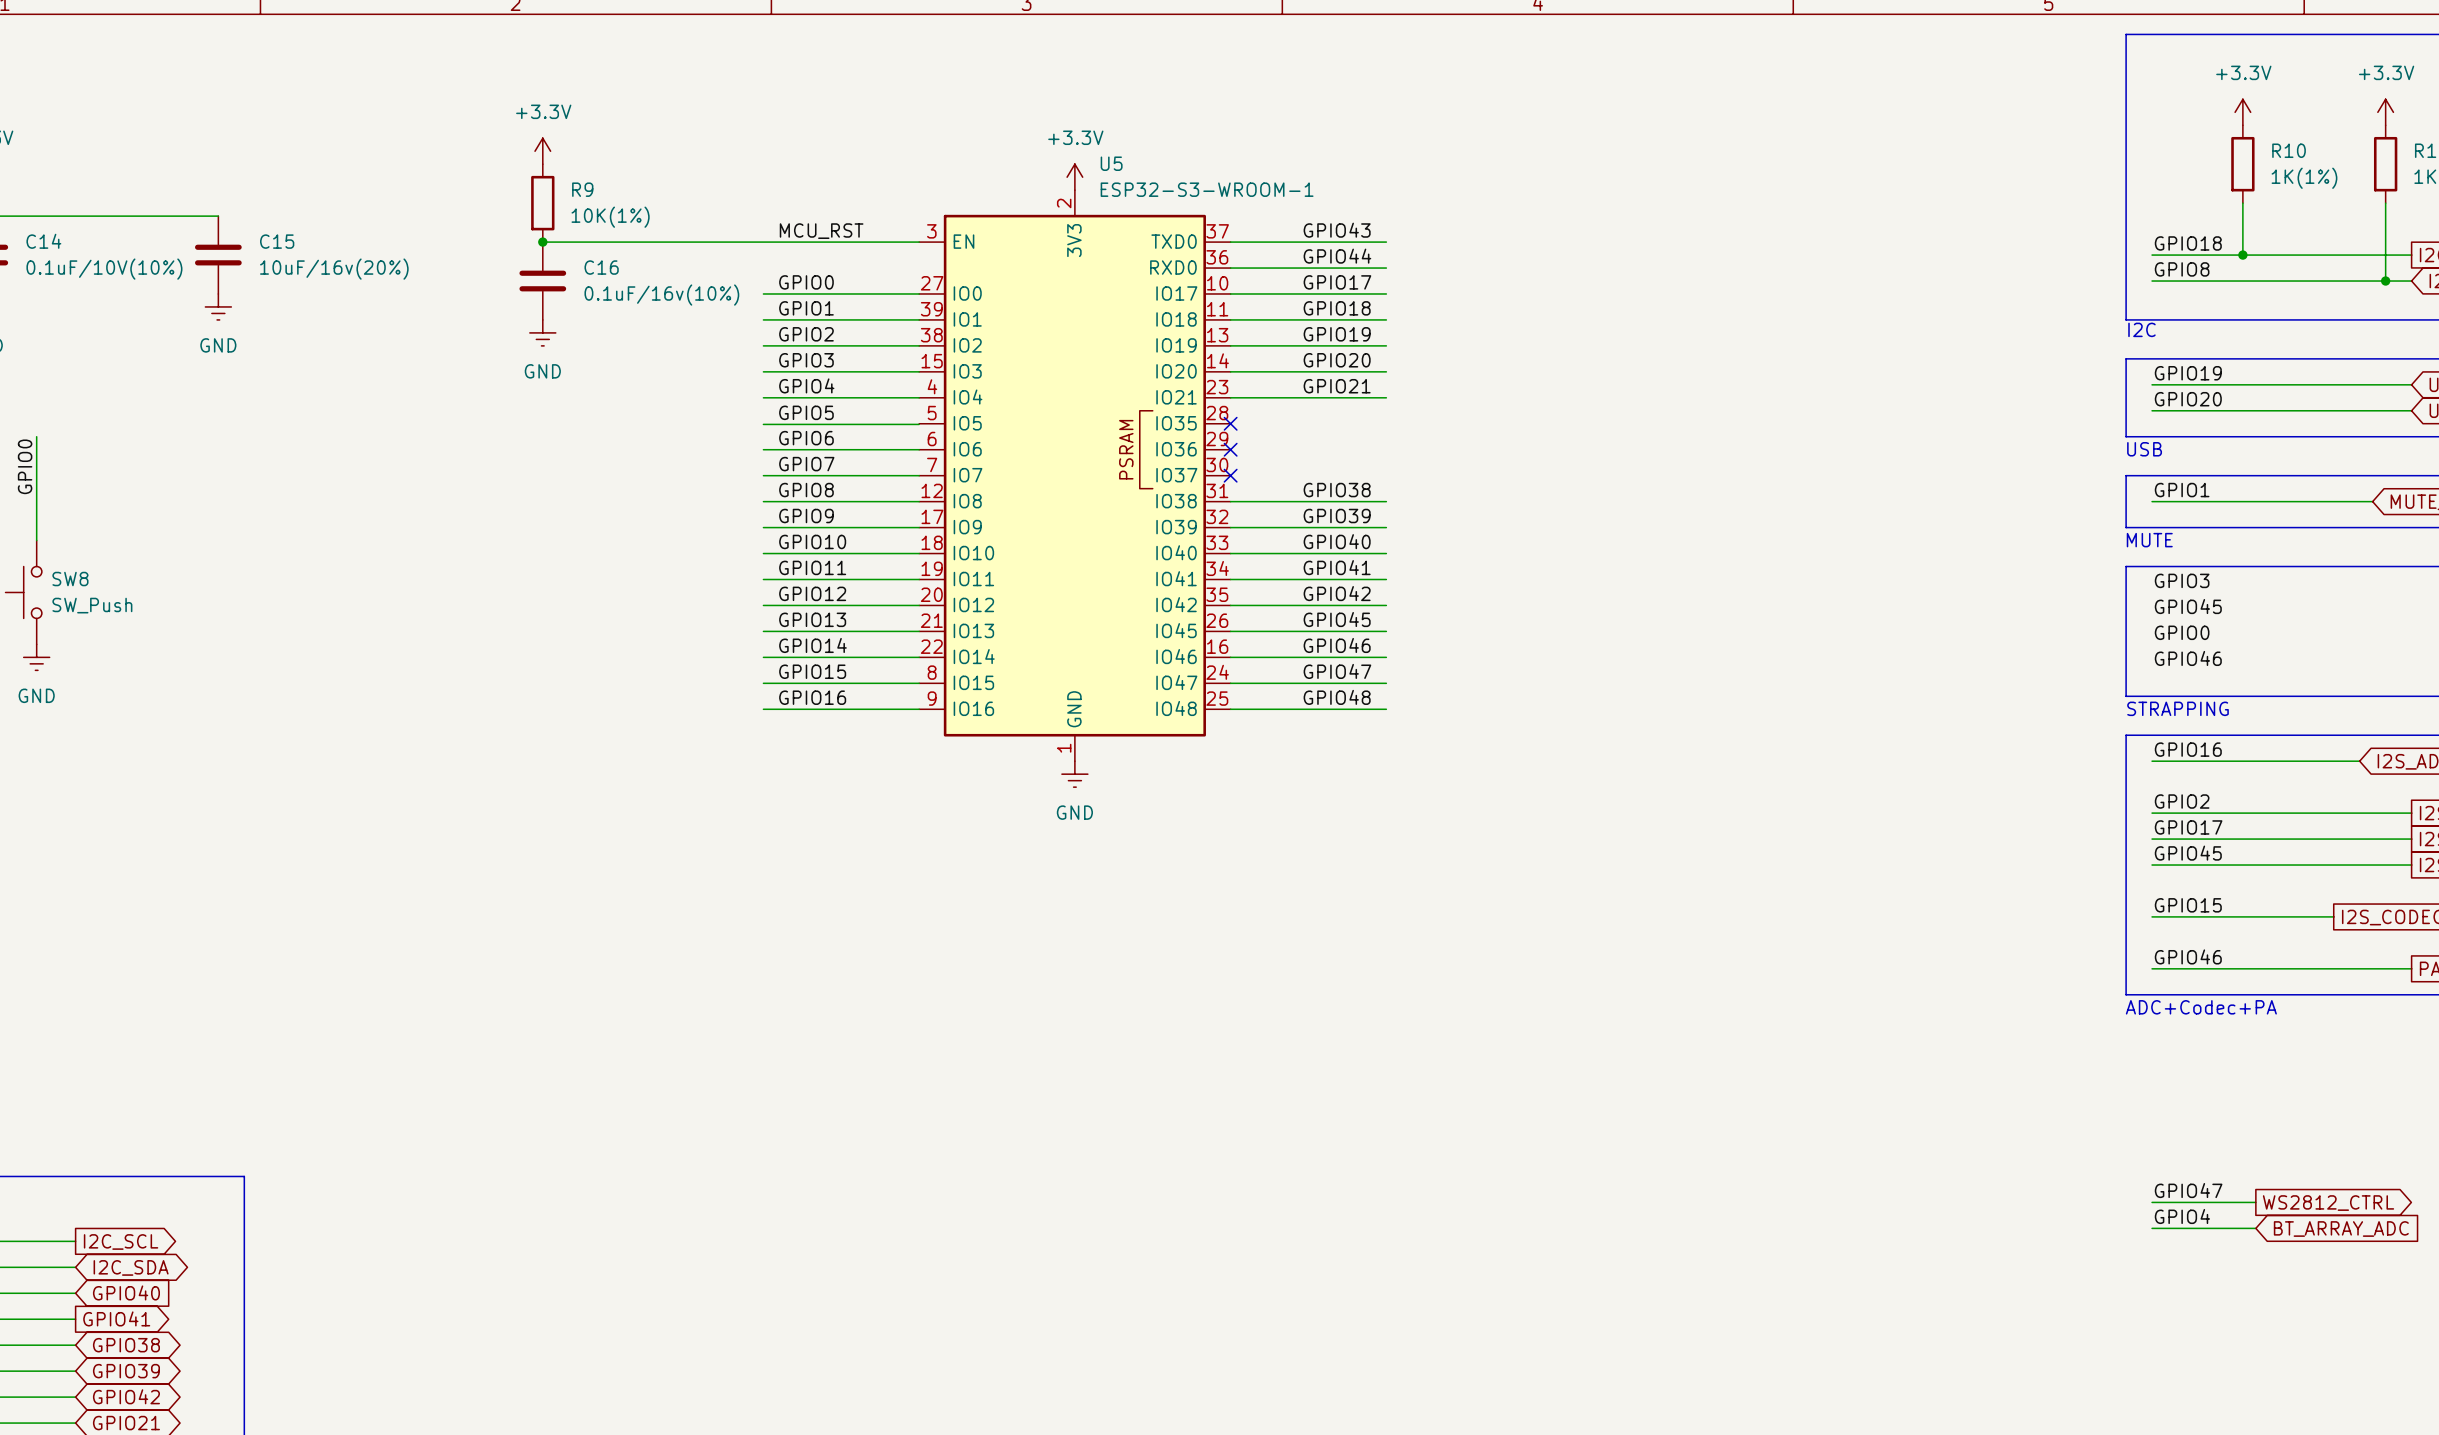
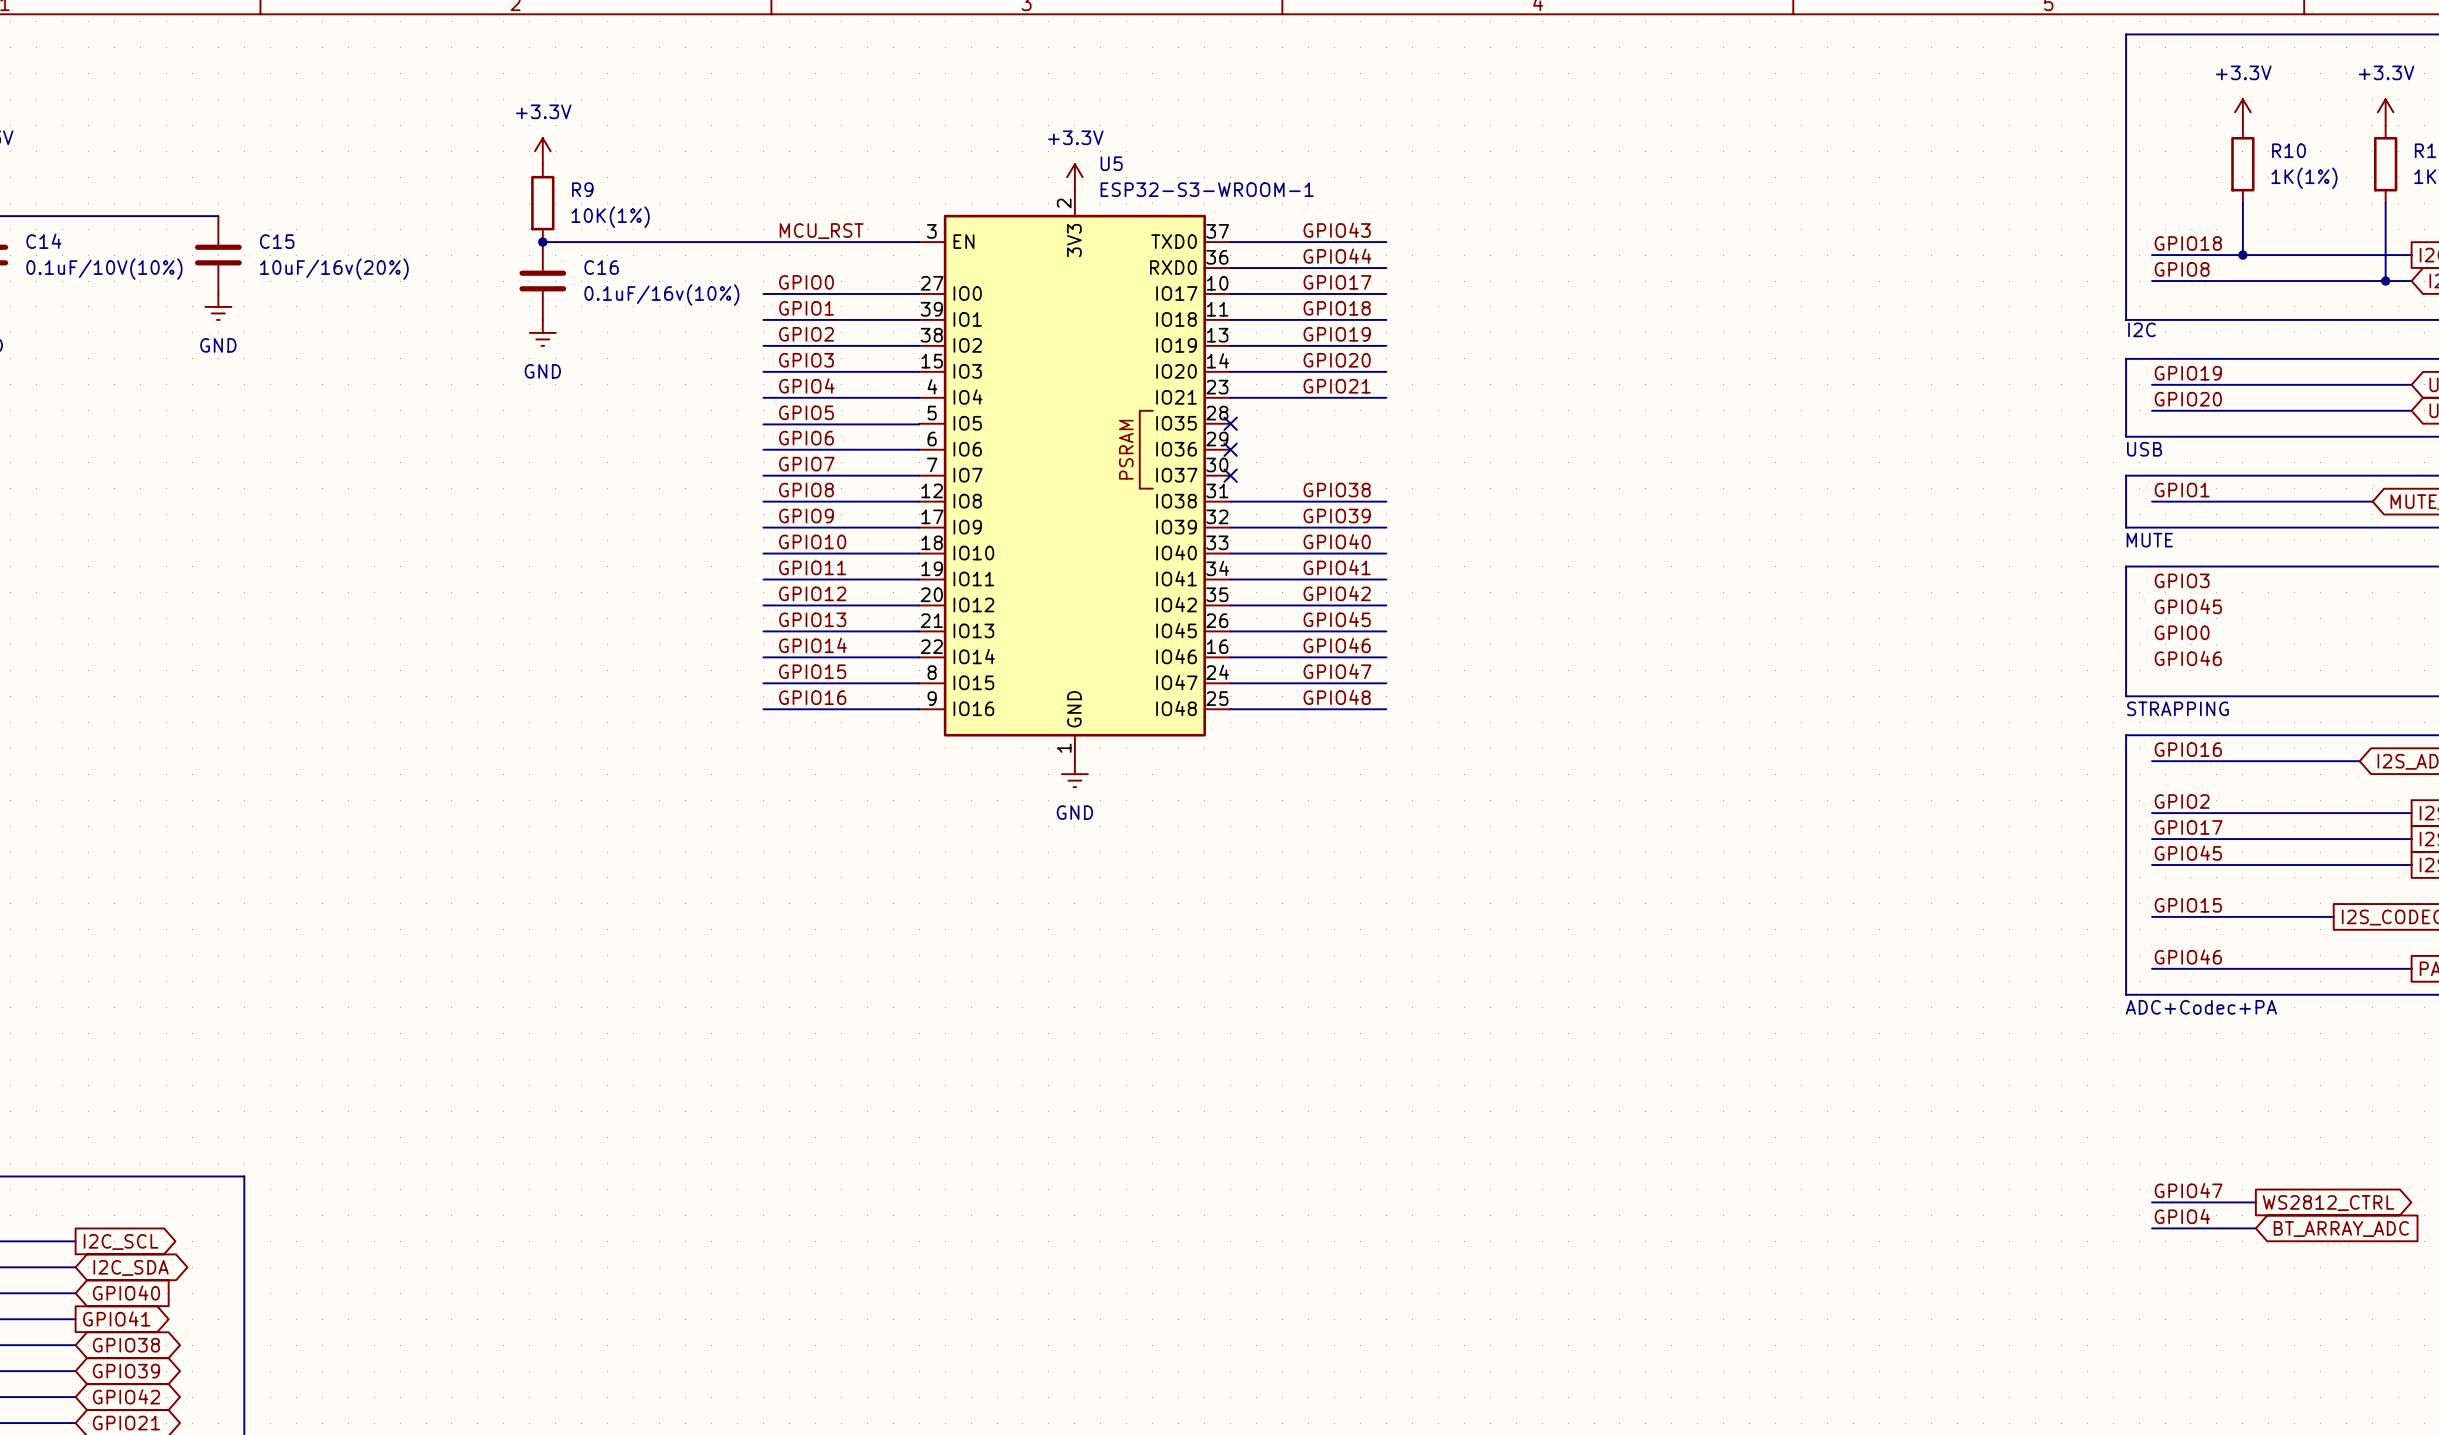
wire: (36, 436) (36, 540) -> none
label: GPIO0 (25, 466) -> none
SW8: SW_Push (23, 592) -> none
power symbol: GND (36, 657) -> none

